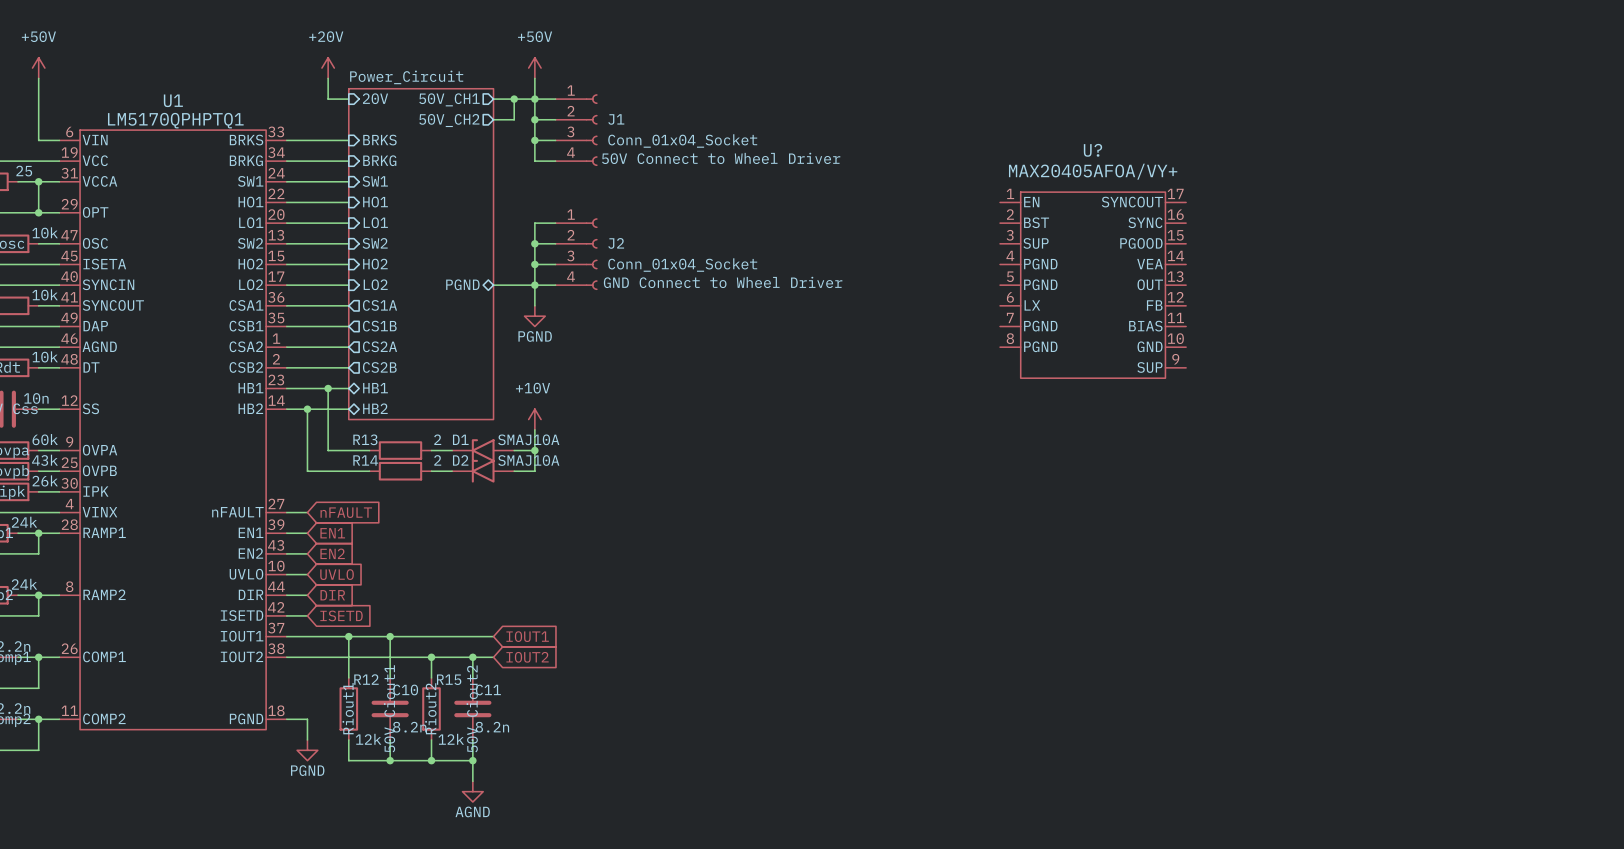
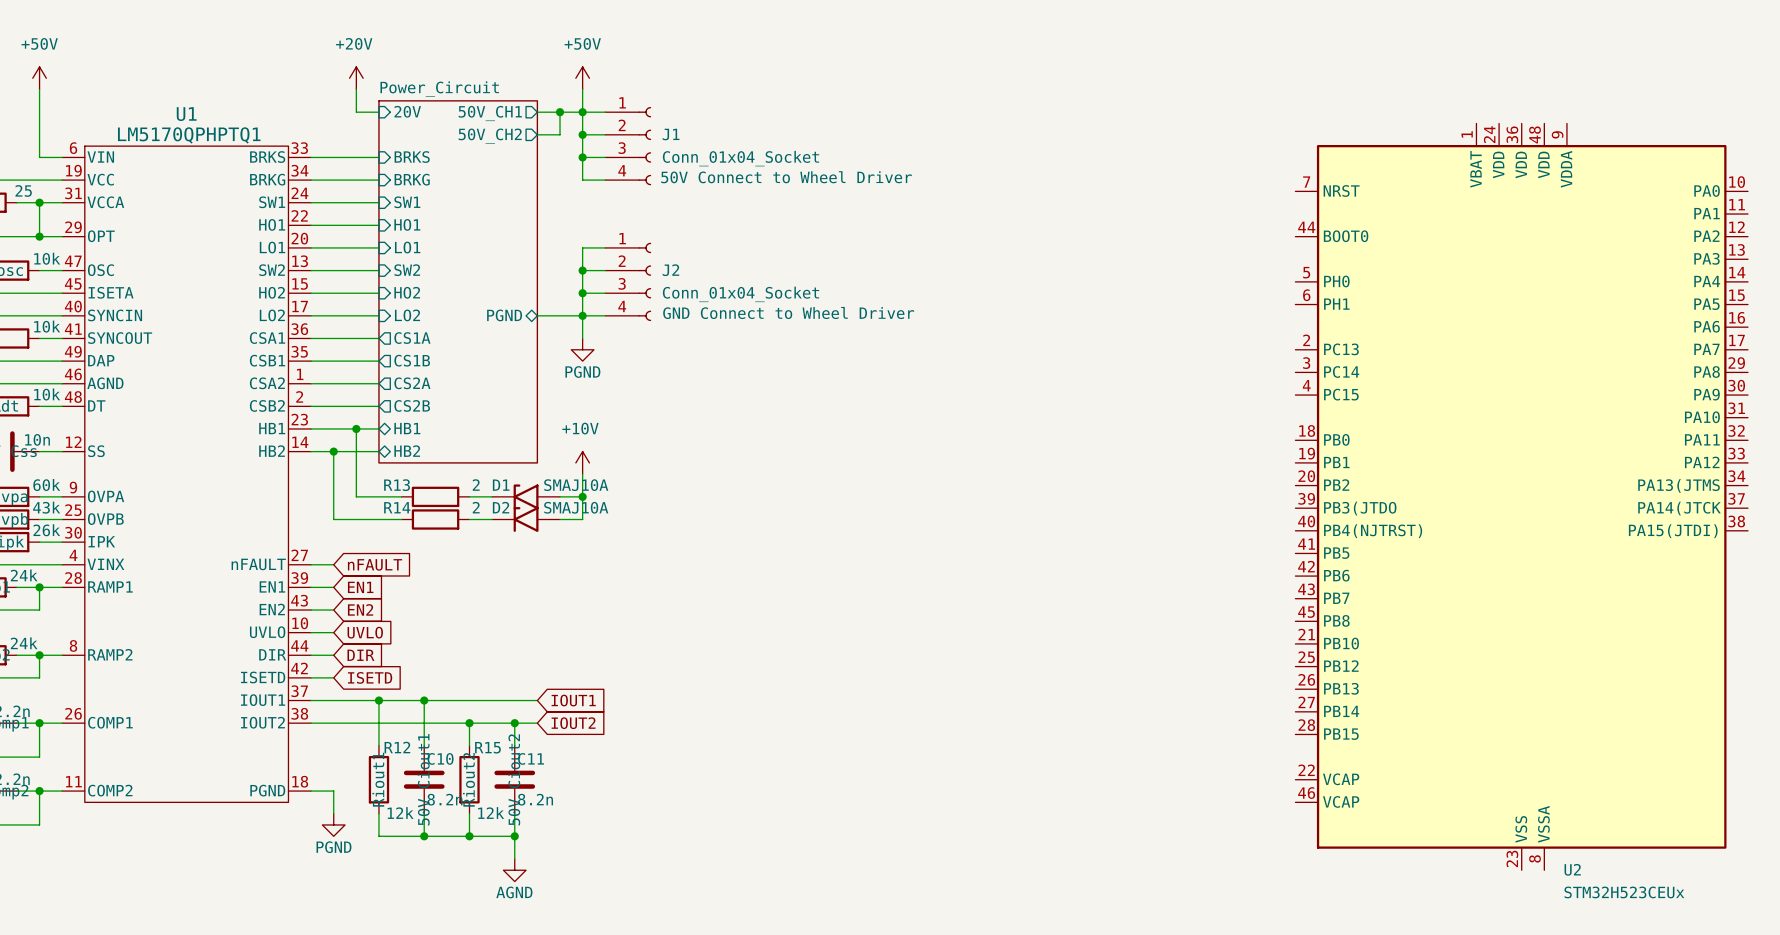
U?: MAX20405AFOA/VY+ (1093, 285) -> none
U2: none -> STM32H523CEUx (1521, 496)

